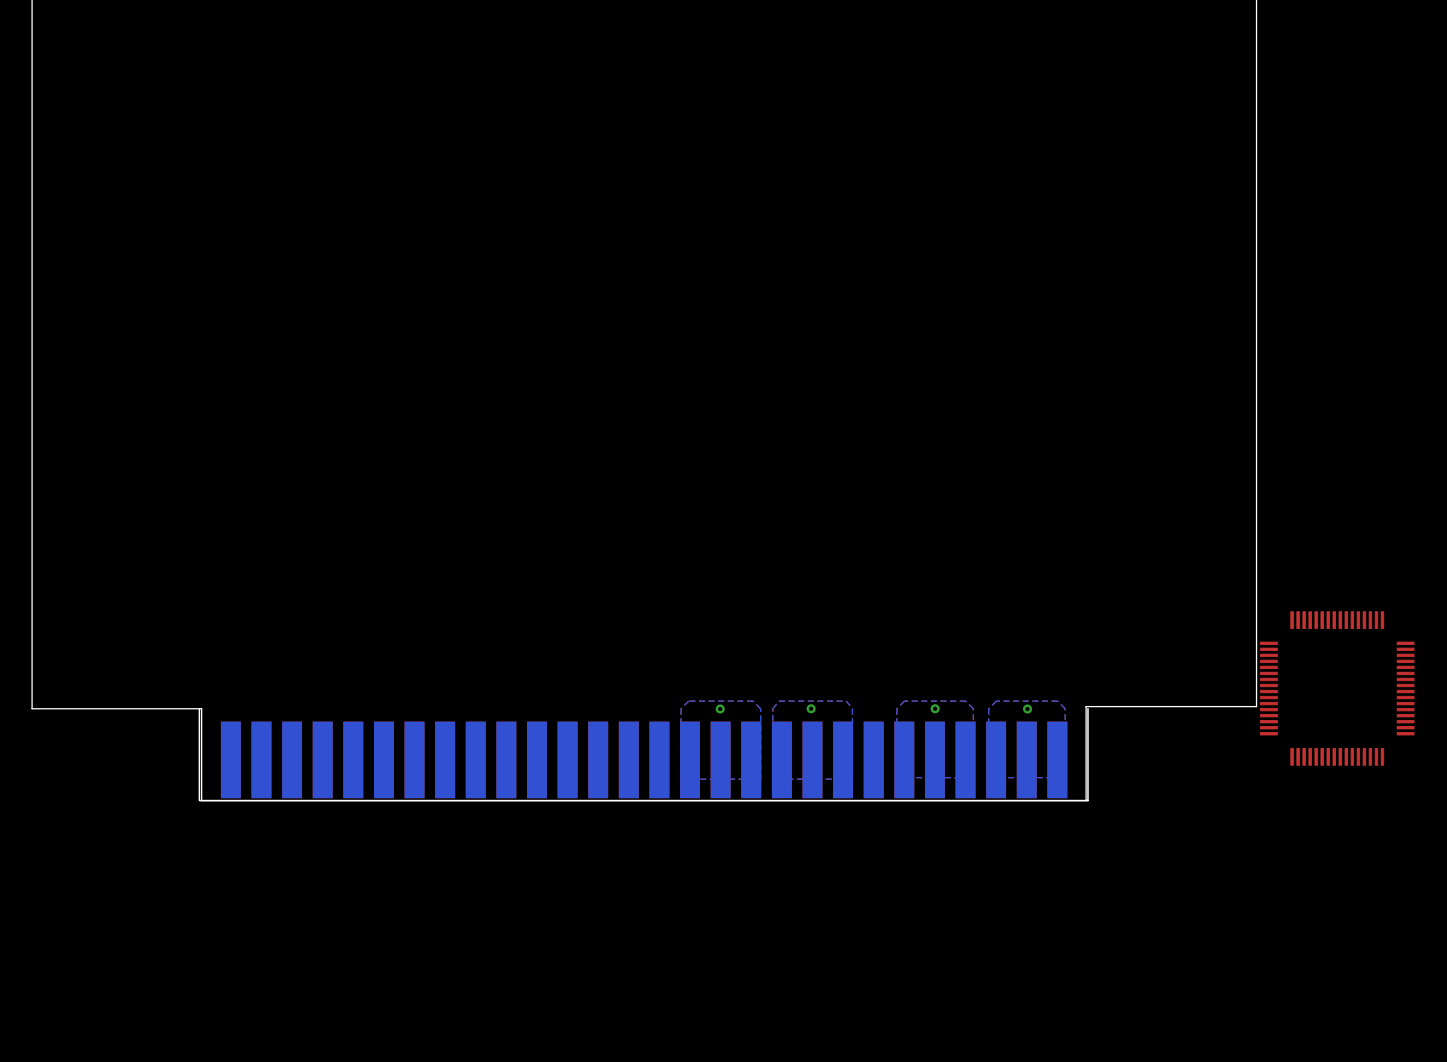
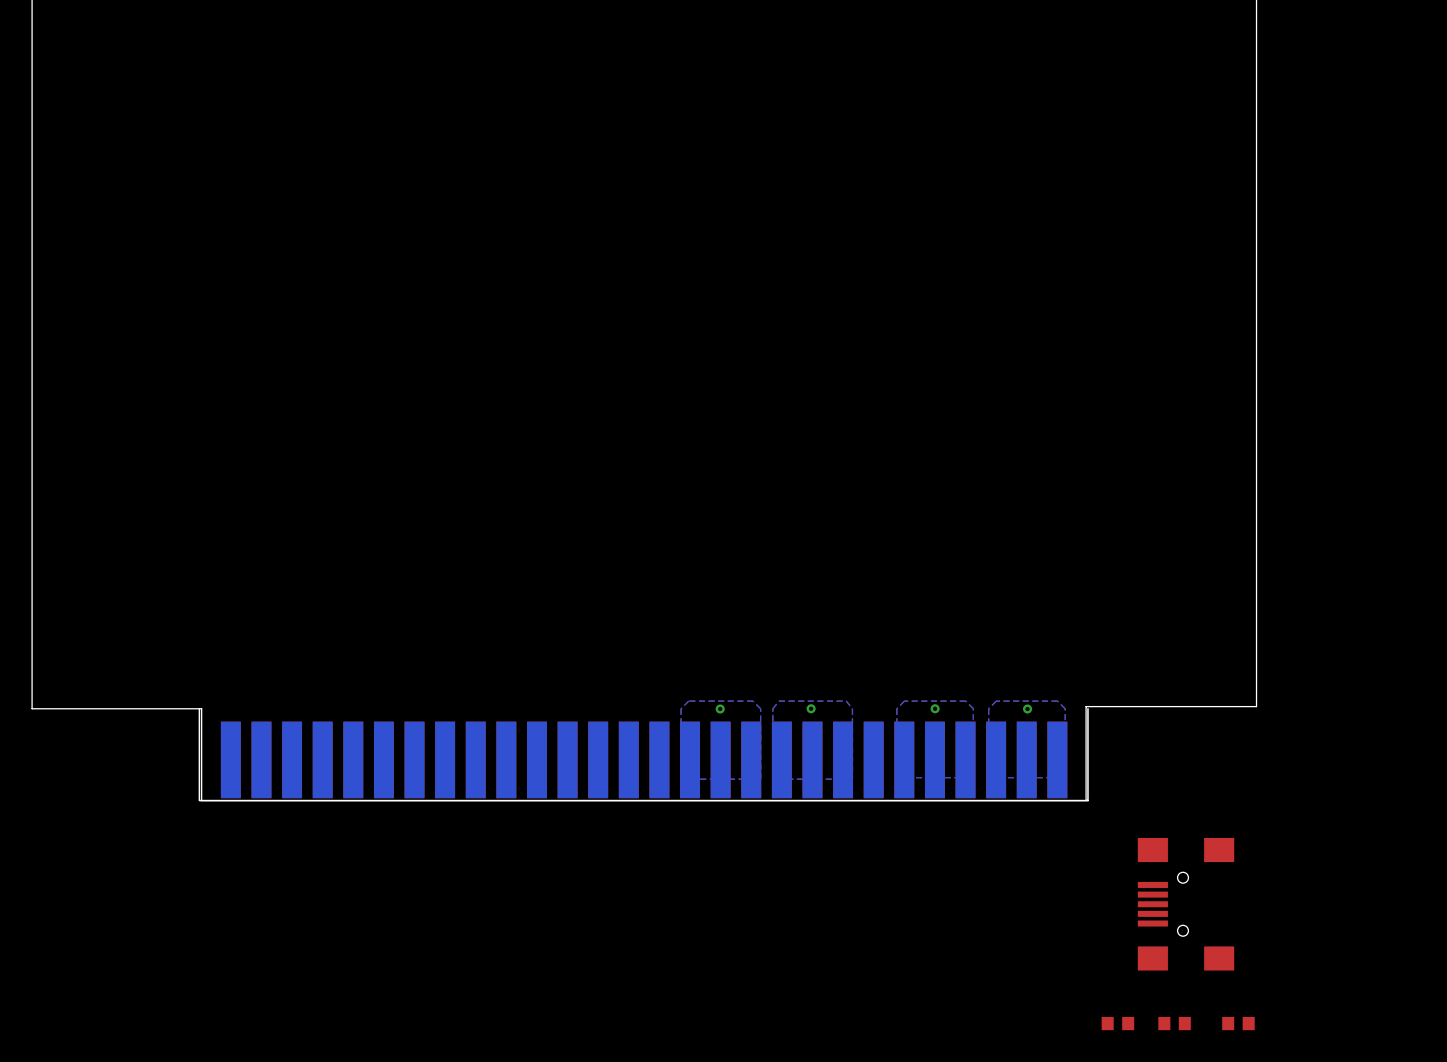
part: (1337, 688) -> none
part: none -> (1186, 904)
part: none -> (1117, 1023)
part: none -> (1174, 1023)
part: none -> (1238, 1023)

